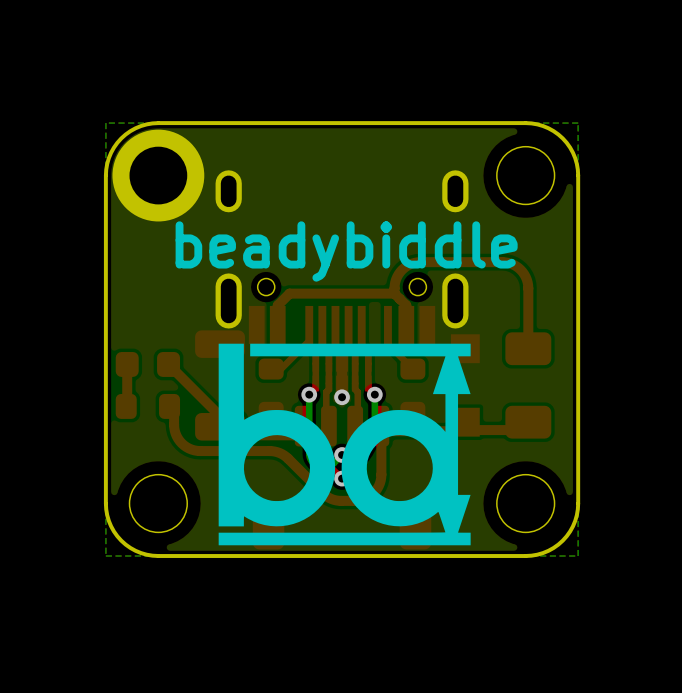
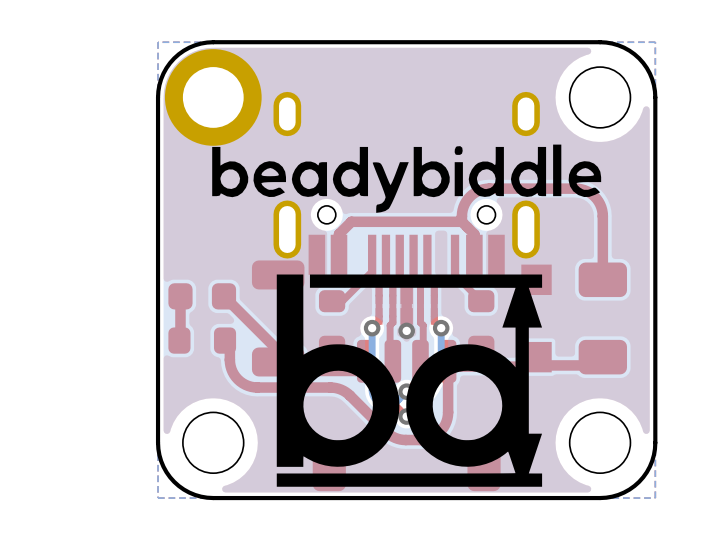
drawing: none -> [212, 144, 602, 213]
text: biddle (432, 244) -> none
text: beady (257, 251) -> none

